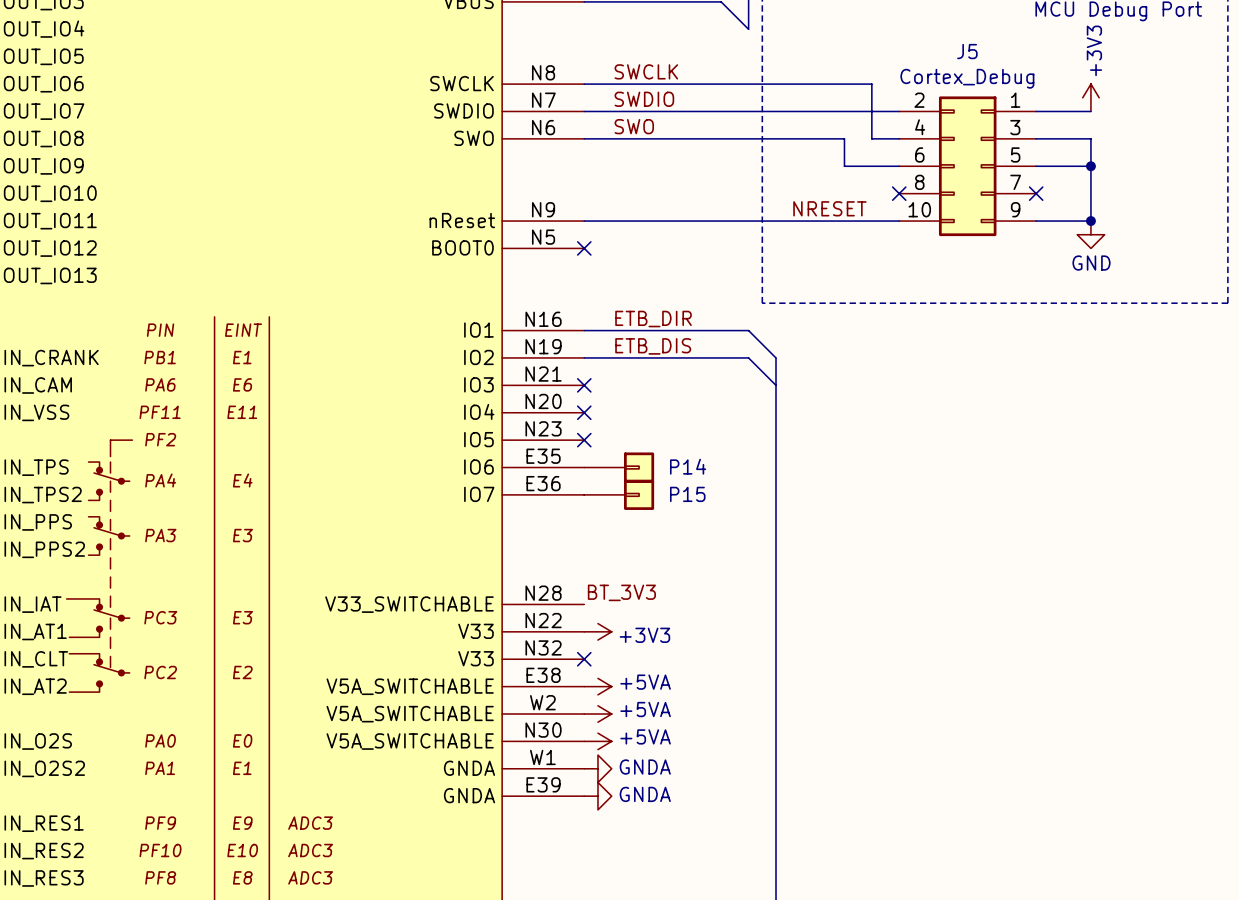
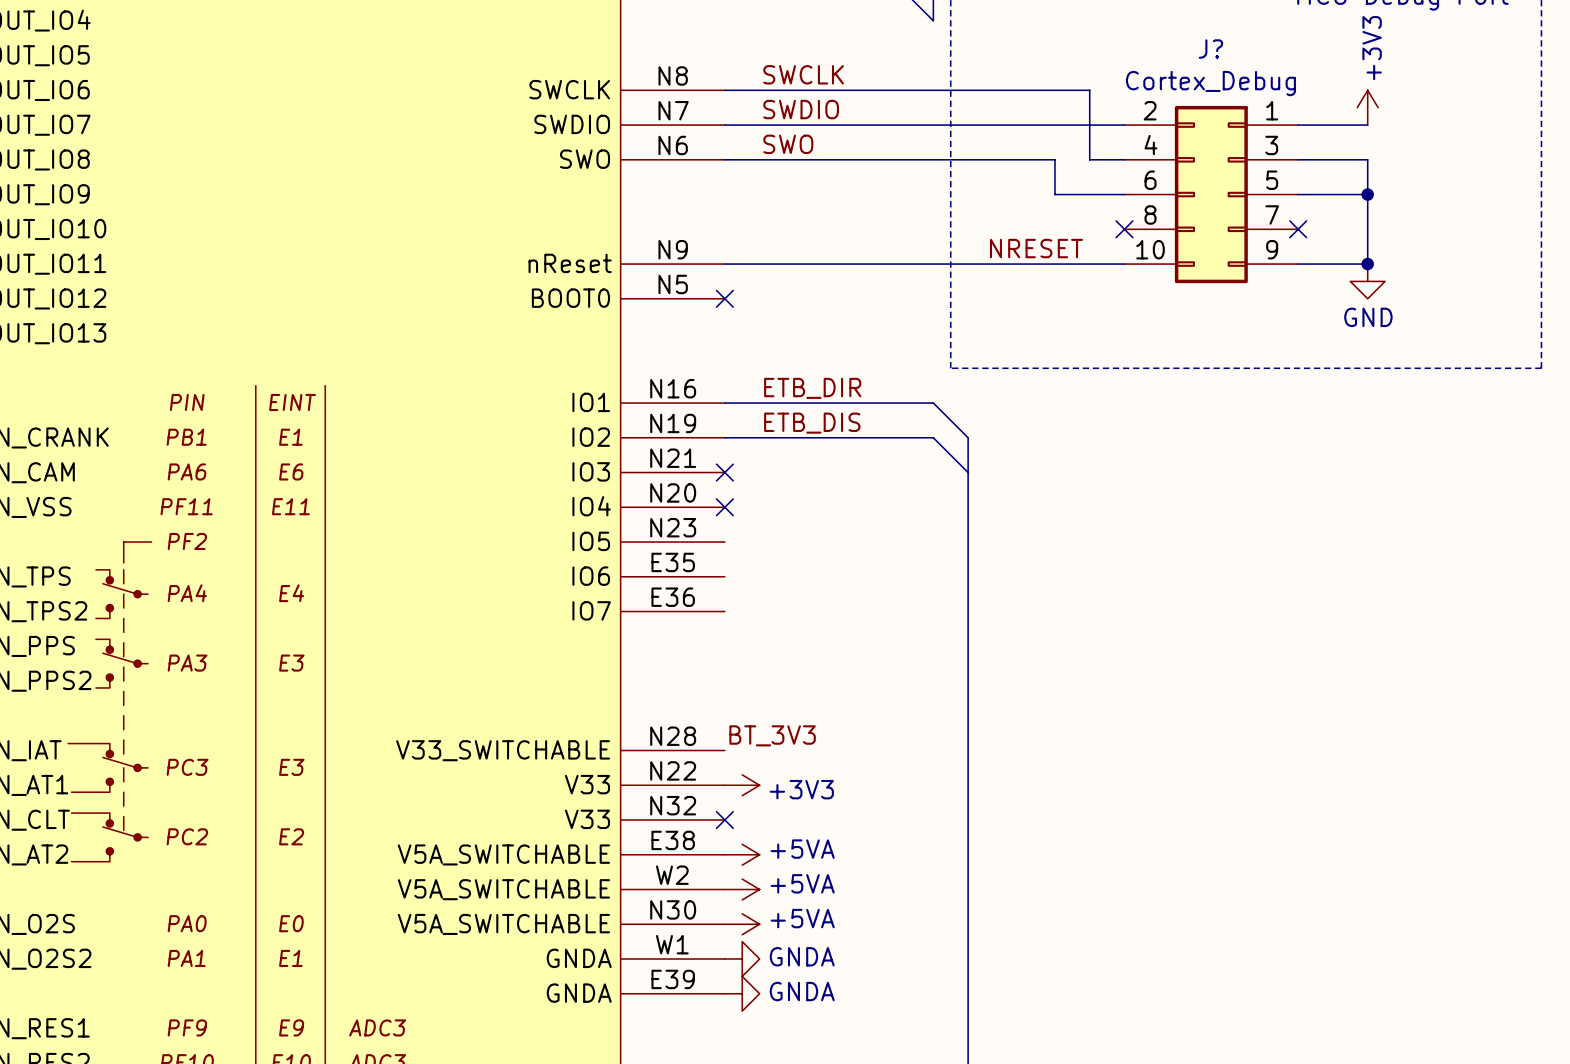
J5 name: J5 (967, 51) -> J? (1210, 49)
no-connect mark: (584, 440) -> none
P14: (619, 467) -> none
P15: (619, 494) -> none

